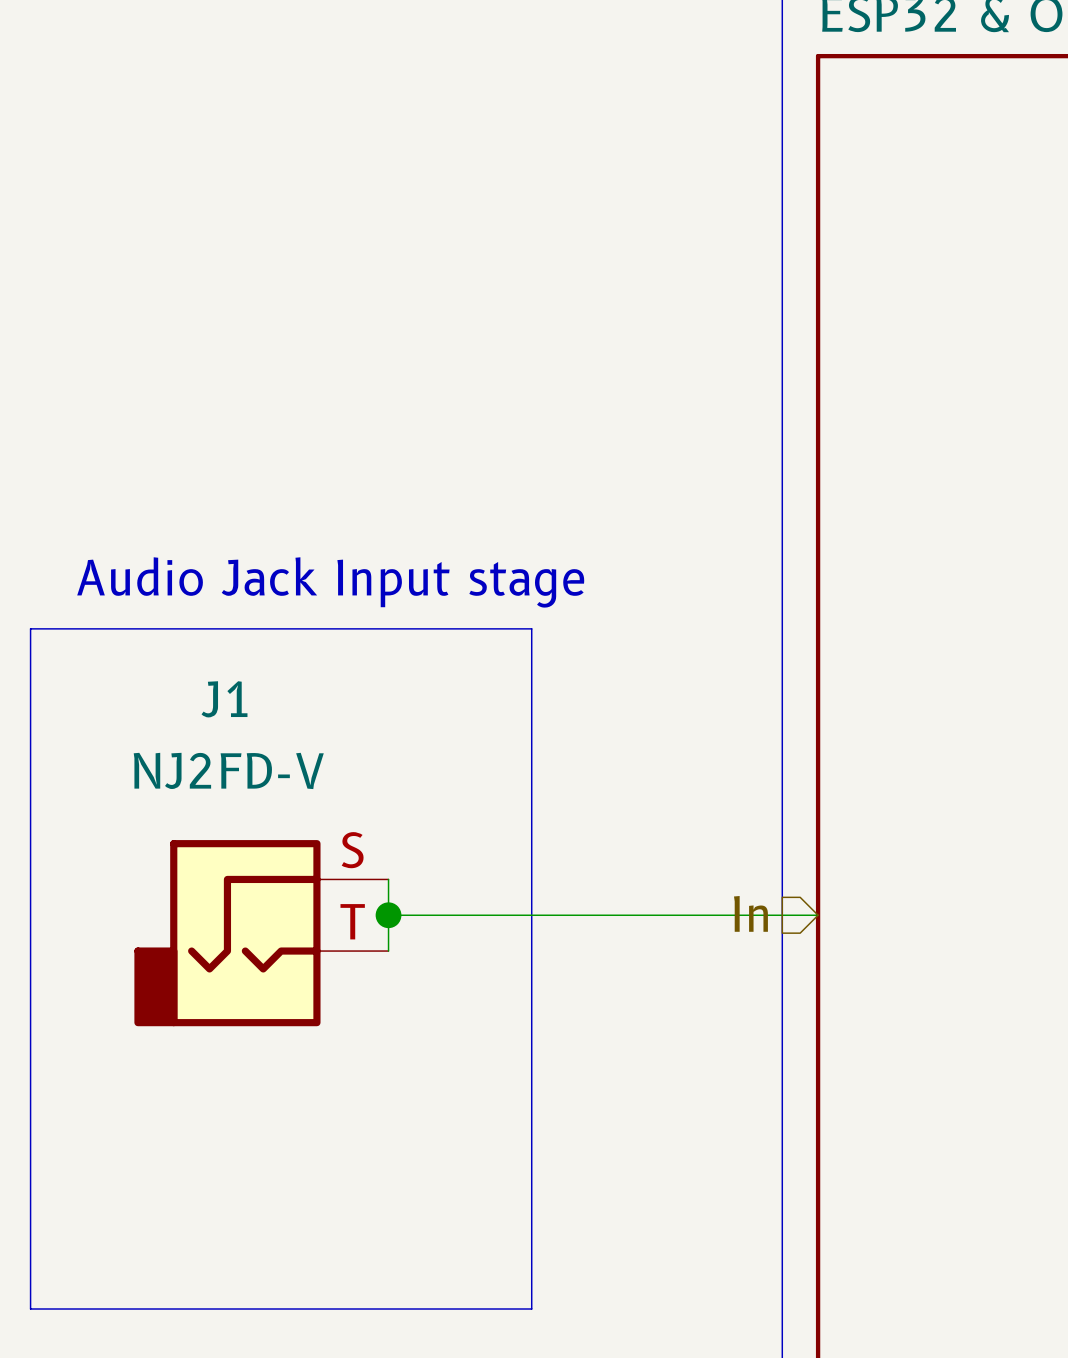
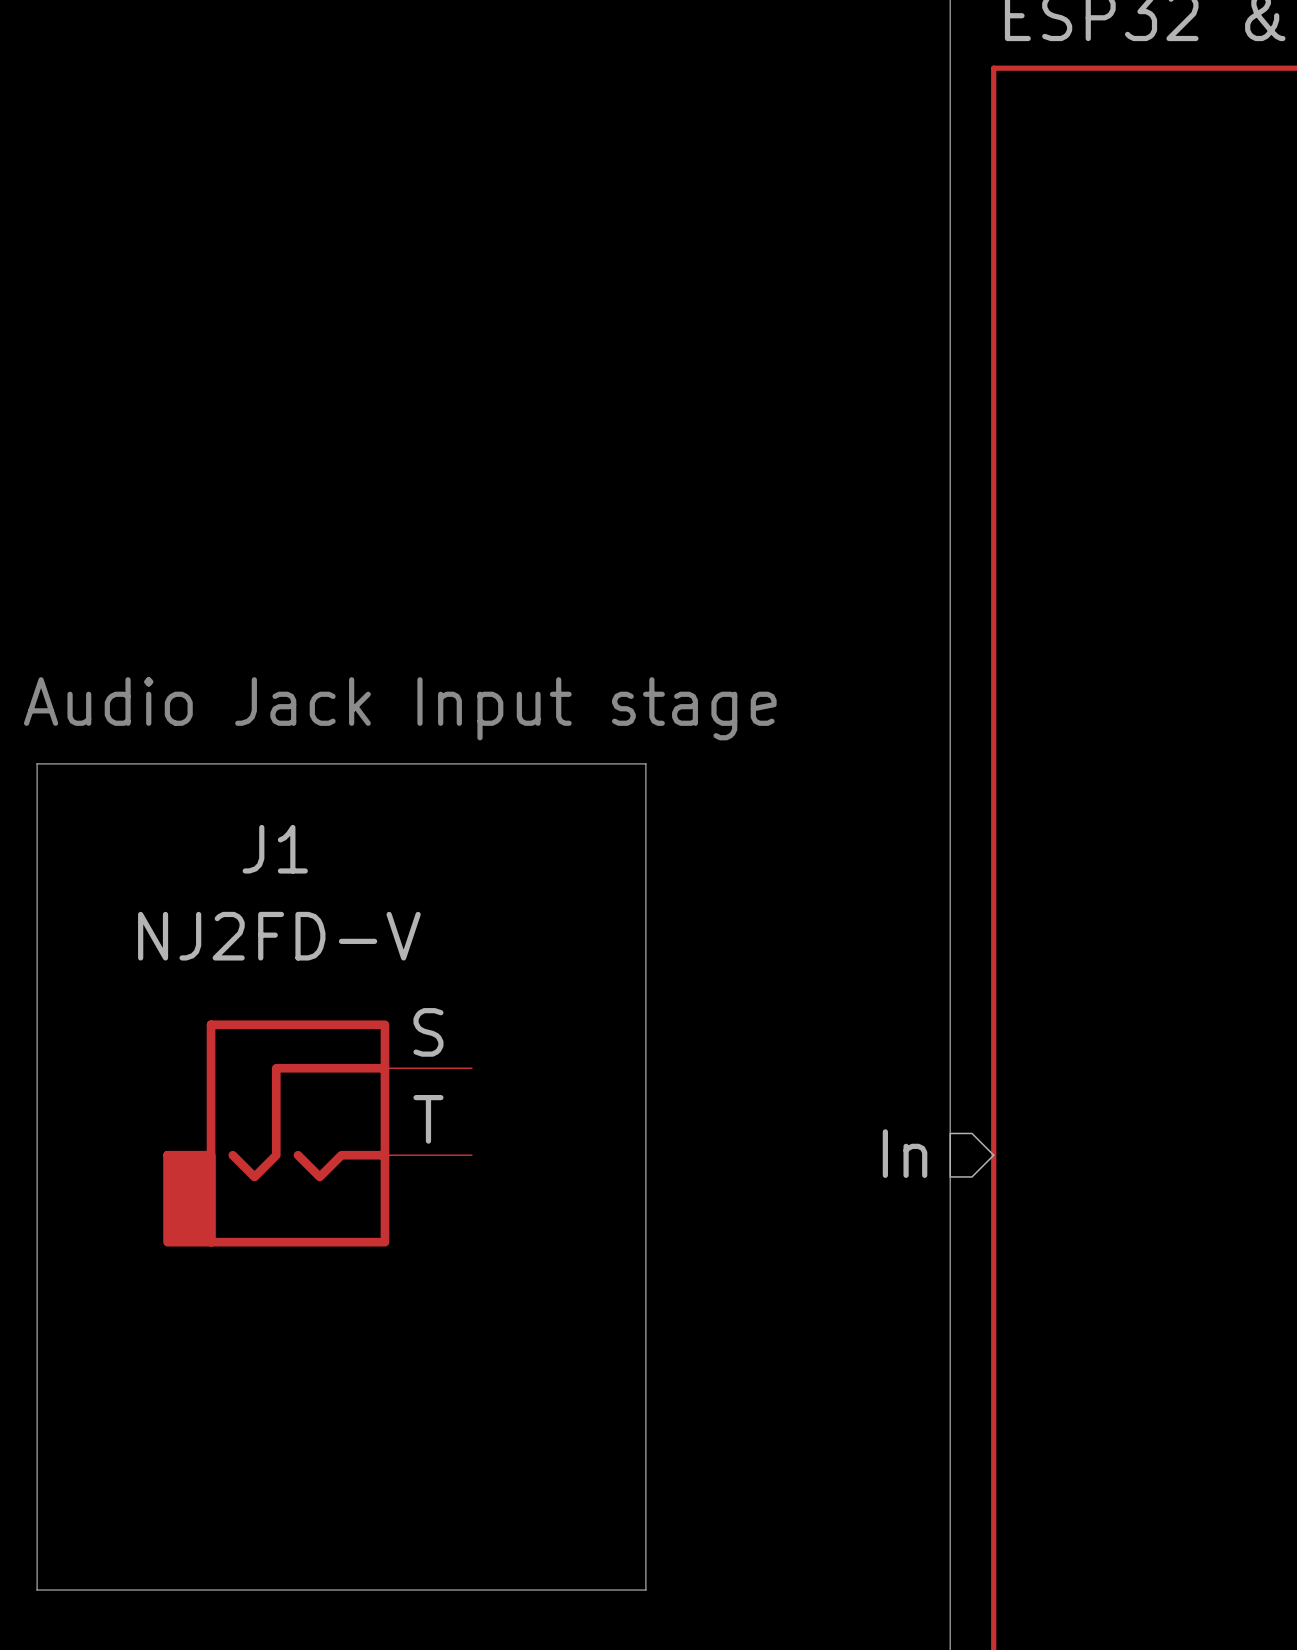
wire: (388, 879) (388, 951) -> none
hierarchical label position: In (750, 913) -> In (905, 1153)
wire: (388, 915) (818, 915) -> none
junction: (388, 915) -> none

